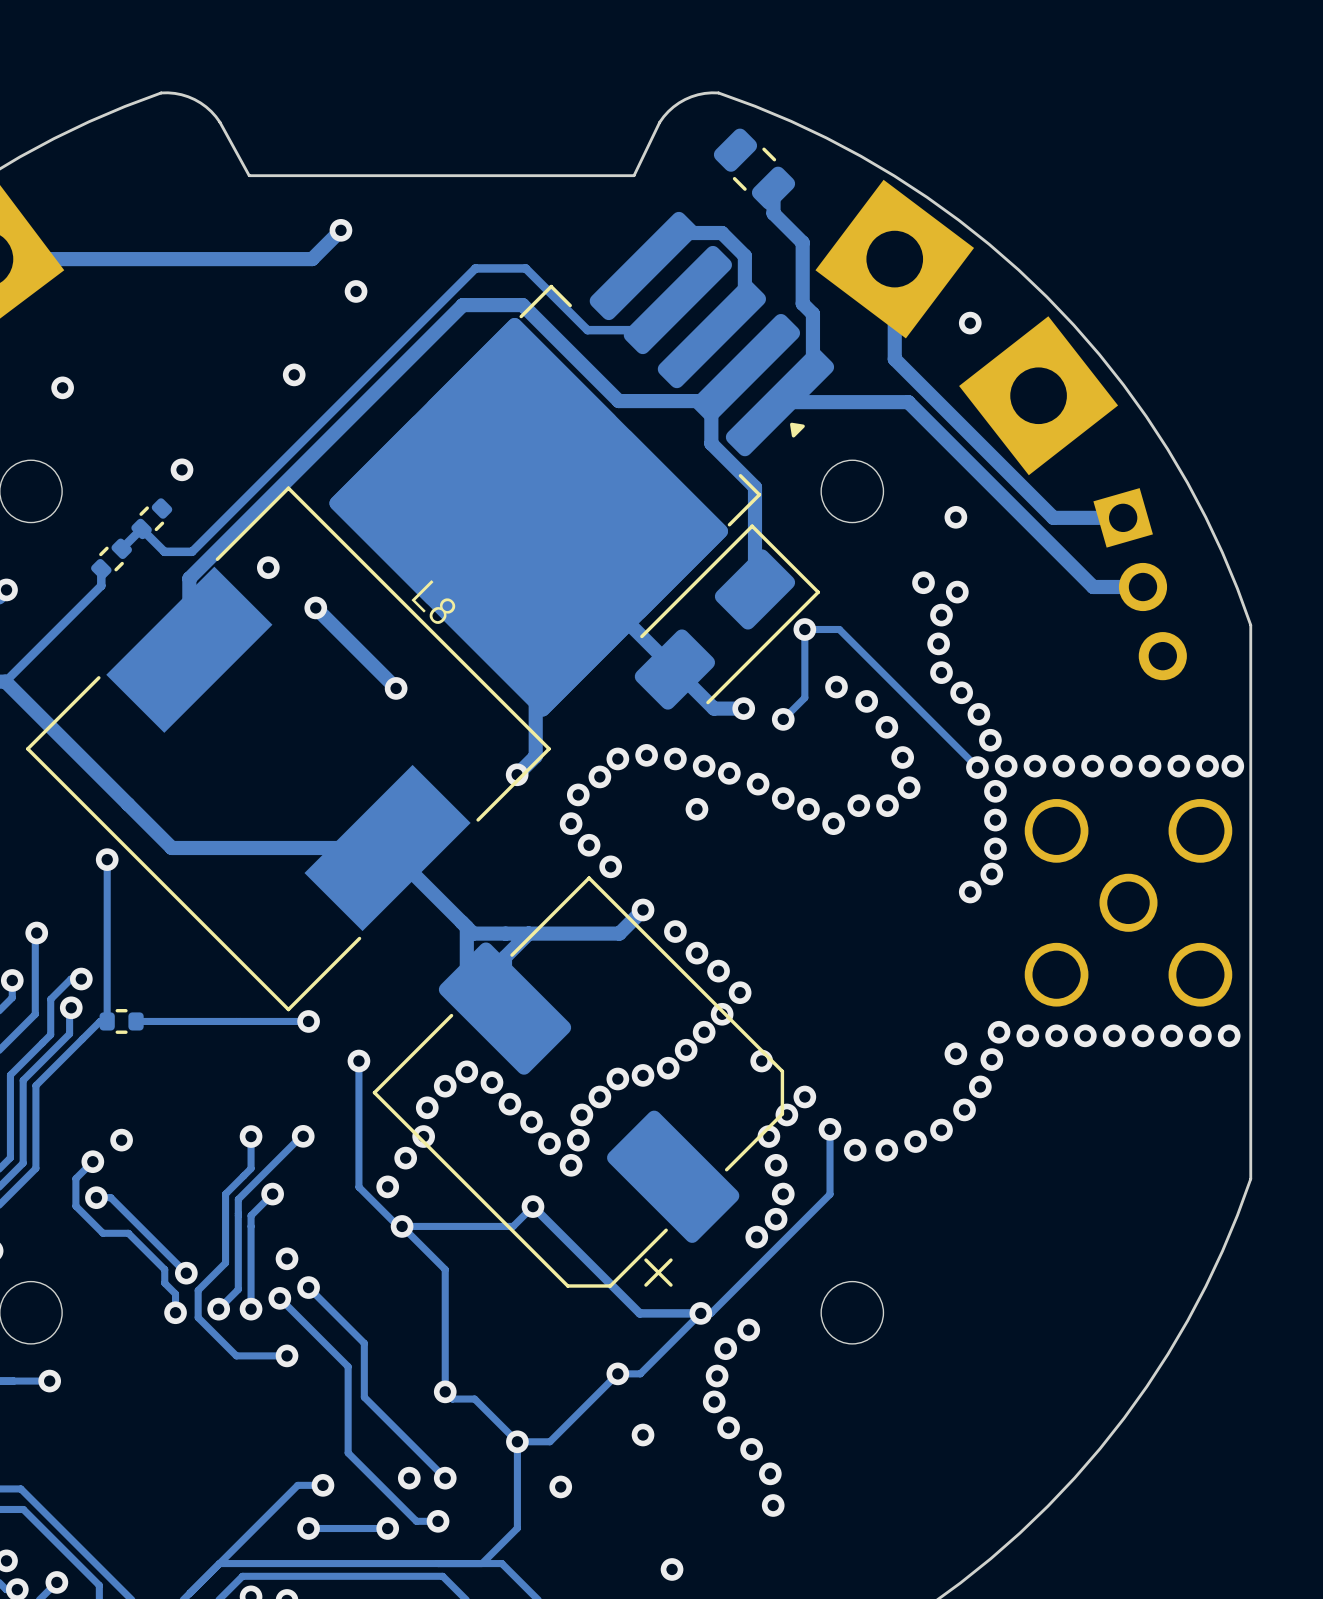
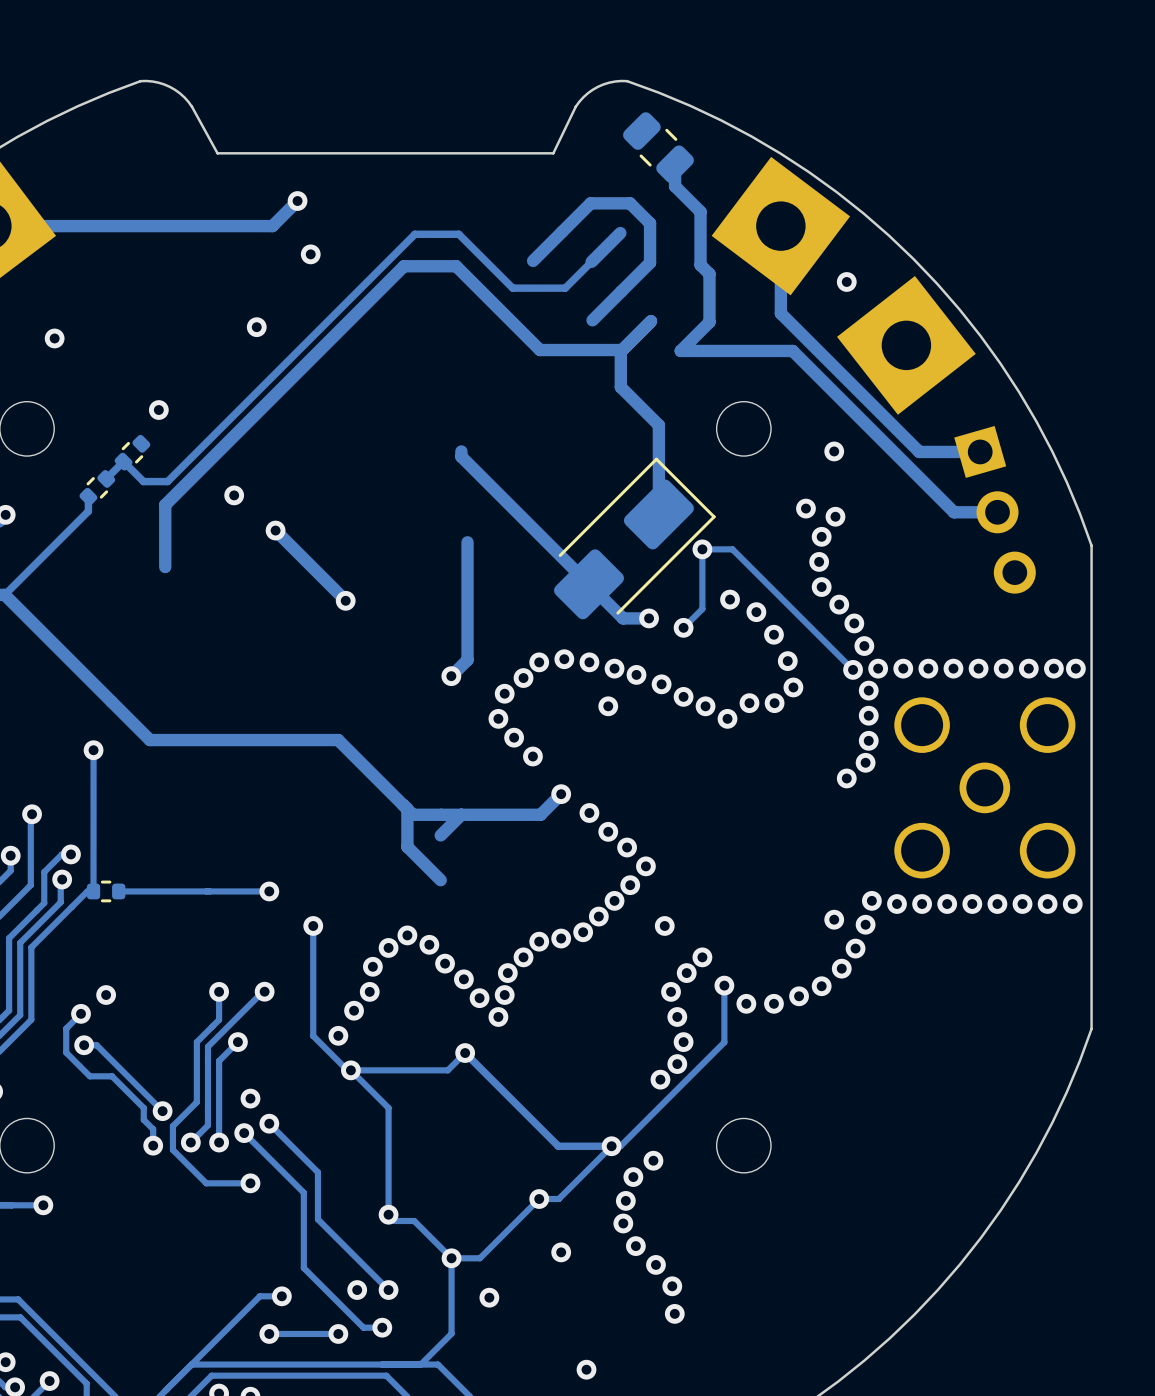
part: (581, 464) -> none
L8: (288, 748) -> none
part: (578, 1082) -> none

